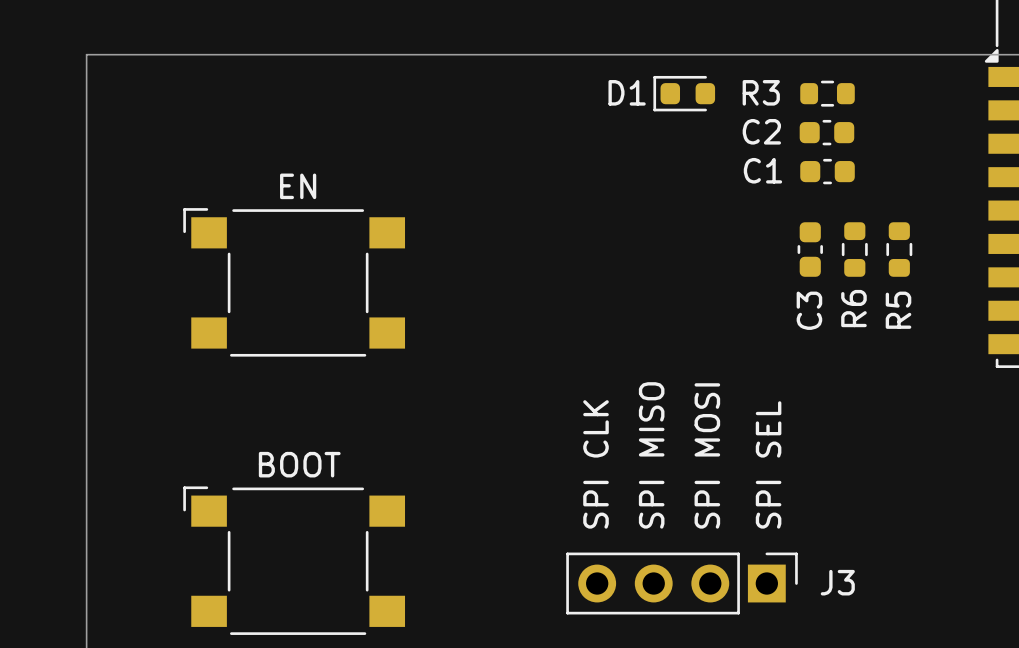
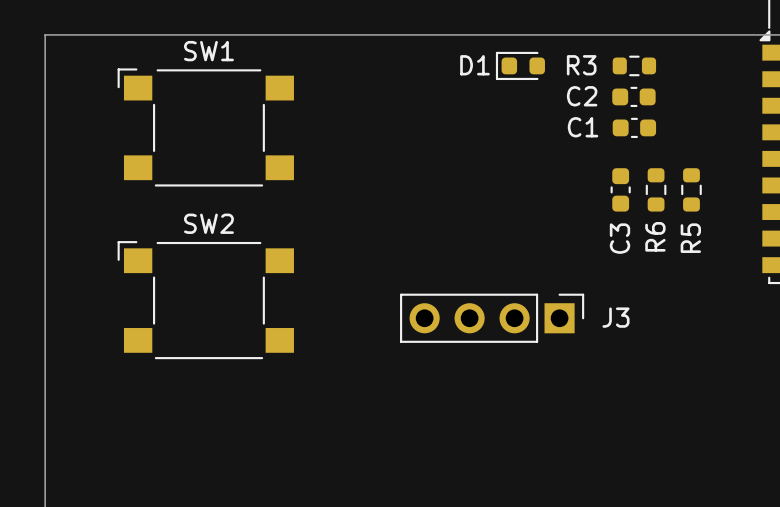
SW1: none -> (205, 127)
EN: (294, 282) -> none
SW2: none -> (205, 300)
text: SPI MISO (651, 455) -> none
text: SPI MOSI (707, 455) -> none
text: SPI CLK (596, 464) -> none
text: SPI SEL (768, 464) -> none
BOOT: (294, 560) -> none
J3 position: (682, 583) -> (492, 318)

